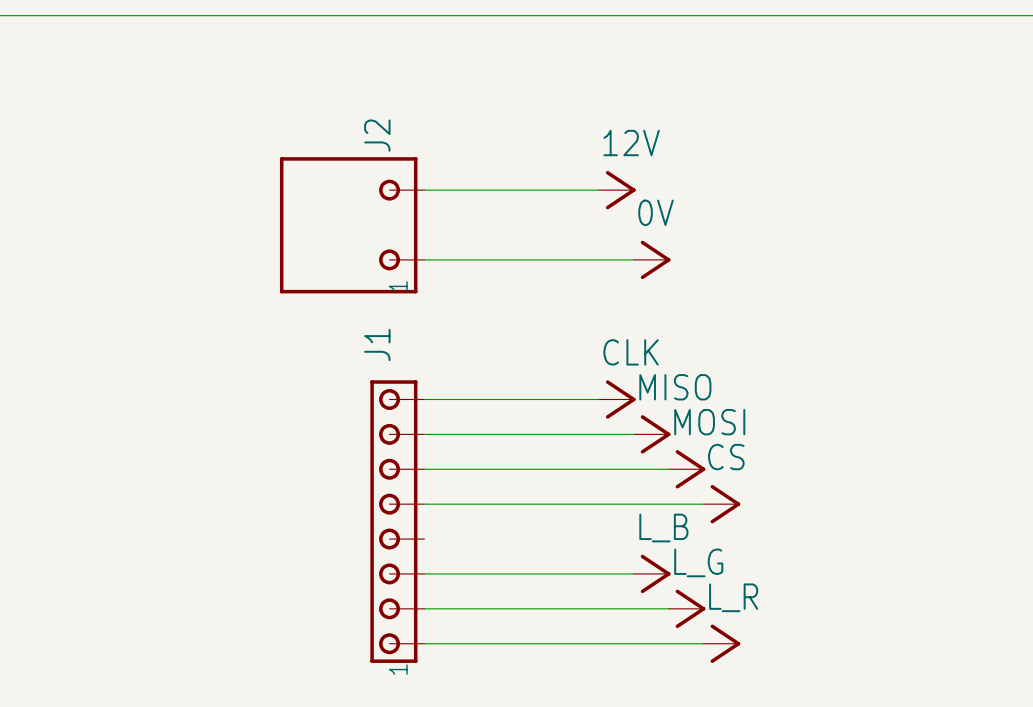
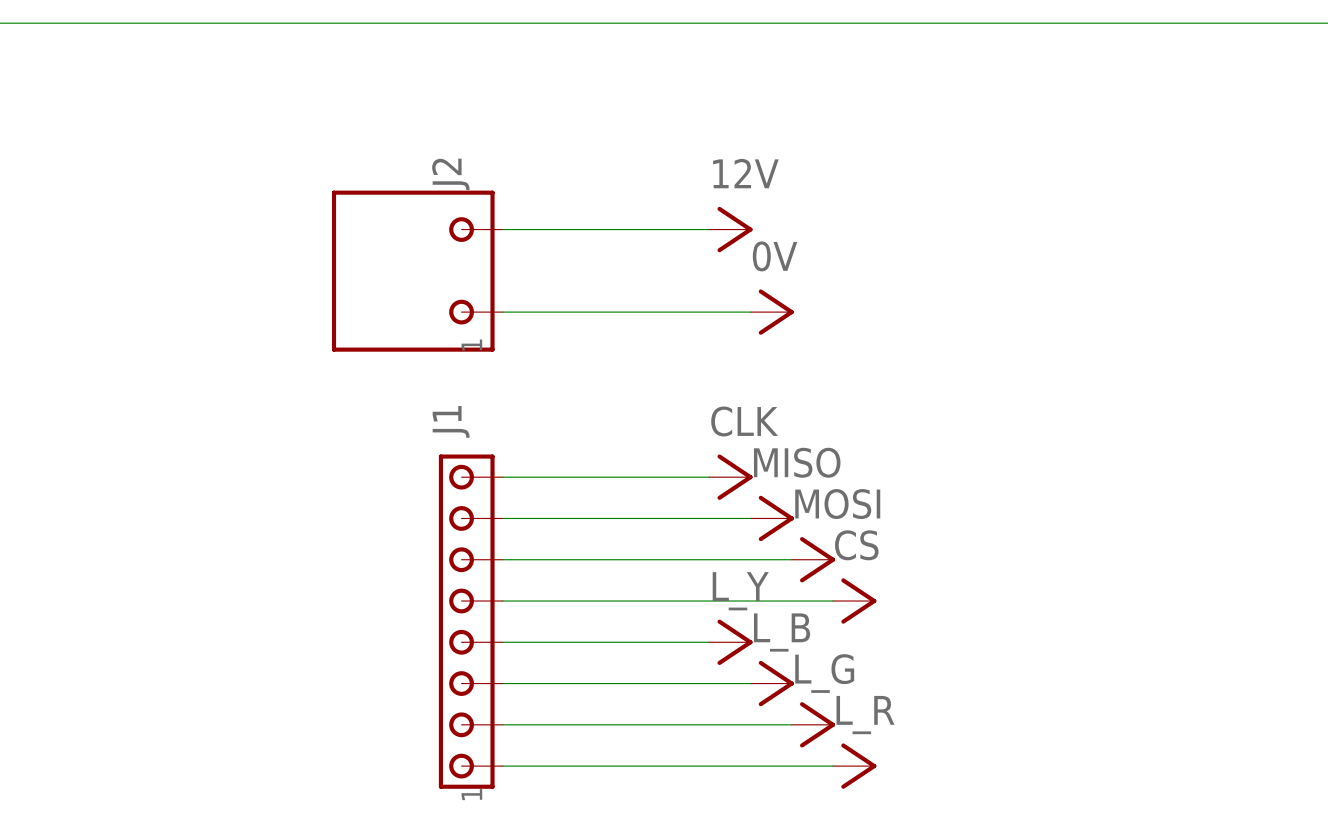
wire: none -> (502, 642) (709, 642)
power symbol: none -> L_Y (730, 642)

